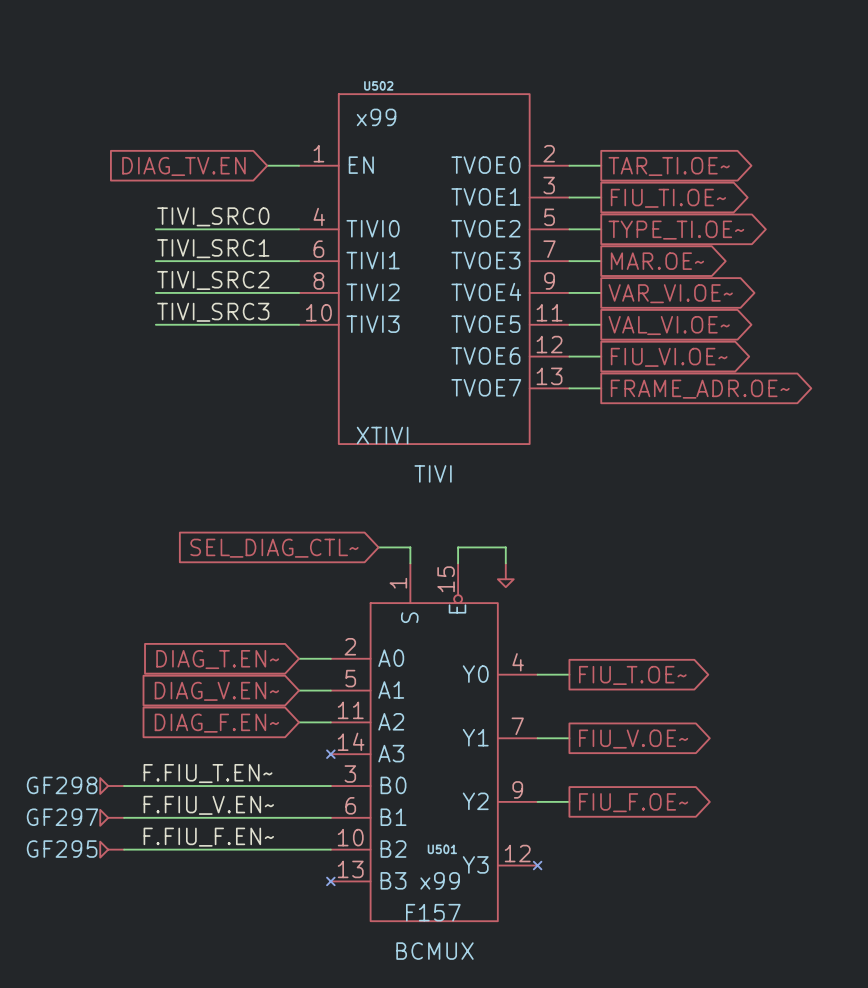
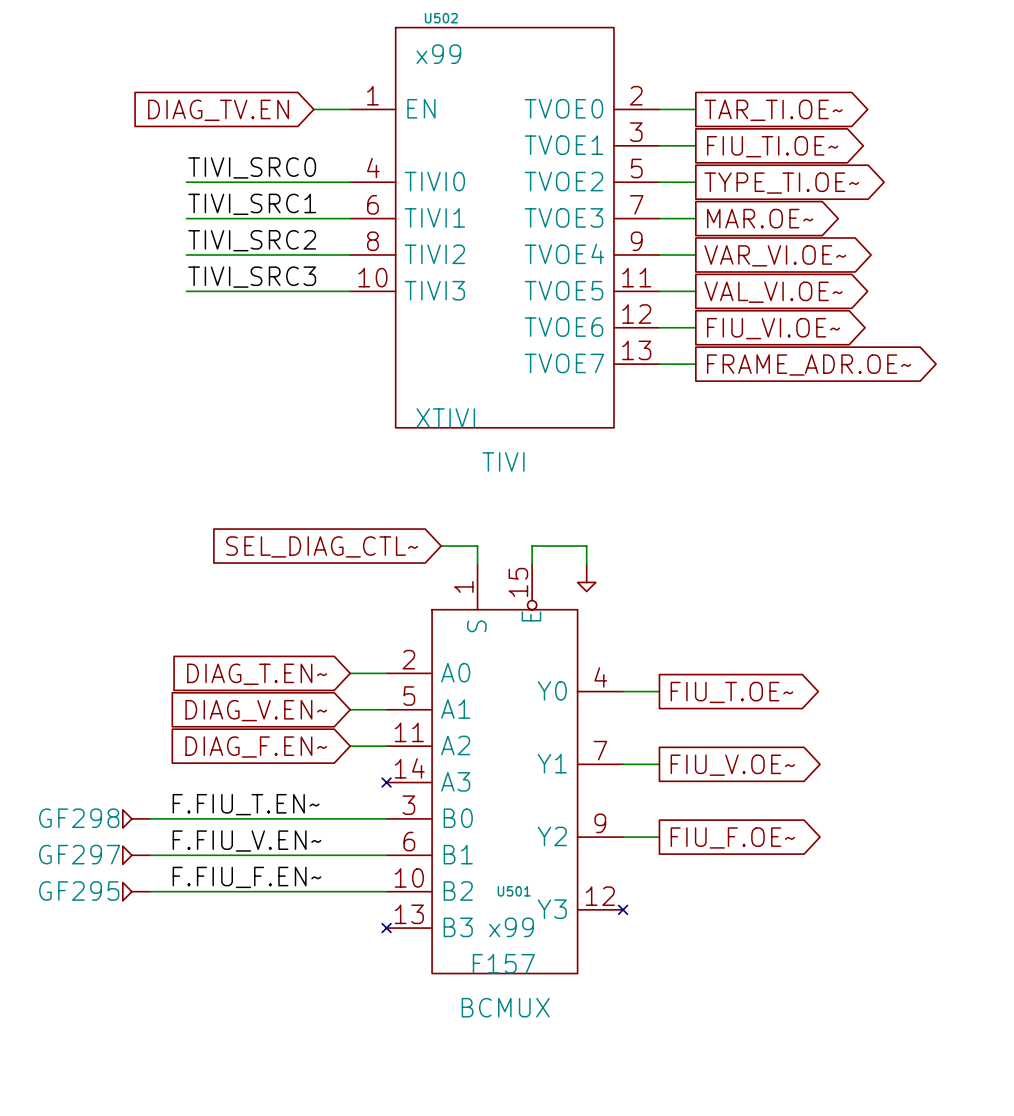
wire: none -> (313, 109) (350, 109)
wire: none -> (659, 109) (695, 109)
global label: none -> TAR_TI.OE~ (773, 110)
wire: none -> (659, 145) (695, 145)
global label: none -> FIU_TI.OE~ (772, 146)
label: none -> TIVI_SRC0 (252, 167)
wire: none -> (186, 182) (313, 182)
global label position: DIAG_TV.EN (183, 166) -> DIAG_TV.EN (218, 110)
global label: TAR_TI.OE~ (669, 166) -> TYPE_TI.OE~ (781, 183)
label: none -> TIVI_SRC1 (252, 204)
global label: FIU_TI.OE~ (668, 198) -> MAR.OE~ (760, 218)
label: TIVI_SRC0 (213, 216) -> TIVI_SRC2 (252, 240)
global label: TYPE_TI.OE~ (676, 230) -> VAR_VI.OE~ (775, 255)
label: TIVI_SRC1 (213, 248) -> TIVI_SRC3 (252, 277)
global label: MAR.OE~ (657, 261) -> VAL_VI.OE~ (773, 292)
U502 position: (434, 269) -> (504, 227)
label: TIVI_SRC2 (213, 280) -> none
wire: (155, 292) (299, 292) -> (186, 218) (350, 218)
global label: VAR_VI.OE~ (670, 293) -> FIU_VI.OE~ (773, 328)
label: TIVI_SRC3 (213, 312) -> none
wire: (155, 324) (299, 324) -> none
global label: VAL_VI.OE~ (669, 325) -> FRAME_ADR.OE~ (809, 365)
wire: (569, 356) (601, 356) -> none
global label: FIU_VI.OE~ (669, 357) -> none
wire: (569, 388) (601, 388) -> none
global label: FRAME_ADR.OE~ (700, 389) -> none
wire: (378, 547) (410, 547) (410, 563) -> (441, 546) (477, 546) (477, 564)
global label position: SEL_DIAG_CTL~ (274, 548) -> SEL_DIAG_CTL~ (322, 546)
wire: (458, 563) (458, 547) (505, 547) (505, 563) -> (532, 564) (532, 546) (586, 546) (586, 564)
power symbol position: (505, 575) -> (586, 578)
global label: none -> DIAG_T.EN~ (257, 674)
wire: none -> (350, 673) (386, 673)
wire: none -> (623, 691) (659, 691)
global label: none -> FIU_T.OE~ (731, 692)
global label: DIAG_T.EN~ (217, 659) -> DIAG_F.EN~ (256, 747)
global label: FIU_T.OE~ (632, 675) -> FIU_V.OE~ (732, 765)
wire: (299, 690) (330, 690) -> (350, 709) (386, 709)
no-connect mark: none -> (386, 782)
global label position: DIAG_V.EN~ (216, 691) -> DIAG_V.EN~ (256, 710)
label: none -> F.FIU_T.EN~ (246, 804)
GF298: none -> (136, 818)
wire: none -> (150, 818) (350, 818)
global label: DIAG_F.EN~ (216, 723) -> none
global label: FIU_V.OE~ (633, 739) -> FIU_F.OE~ (732, 837)
U501 position: (434, 742) -> (504, 768)
no-connect mark: (330, 754) -> none
label: F.FIU_T.EN~ (208, 773) -> F.FIU_F.EN~ (246, 877)
GF298 name: GF298 (62, 785) -> GF295 (79, 891)
wire: (537, 801) (569, 801) -> none
no-connect mark: none -> (623, 909)
global label: FIU_F.OE~ (633, 802) -> none
label position: F.FIU_V.EN~ (208, 805) -> F.FIU_V.EN~ (246, 841)
GF297 position: (111, 817) -> (136, 855)
wire: (124, 817) (330, 817) -> (150, 855) (386, 855)
no-connect mark: none -> (386, 928)
label: F.FIU_F.EN~ (208, 837) -> none
GF295: (111, 849) -> none
wire: (124, 849) (330, 849) -> none
no-connect mark: (537, 865) -> none
no-connect mark: (330, 881) -> none

